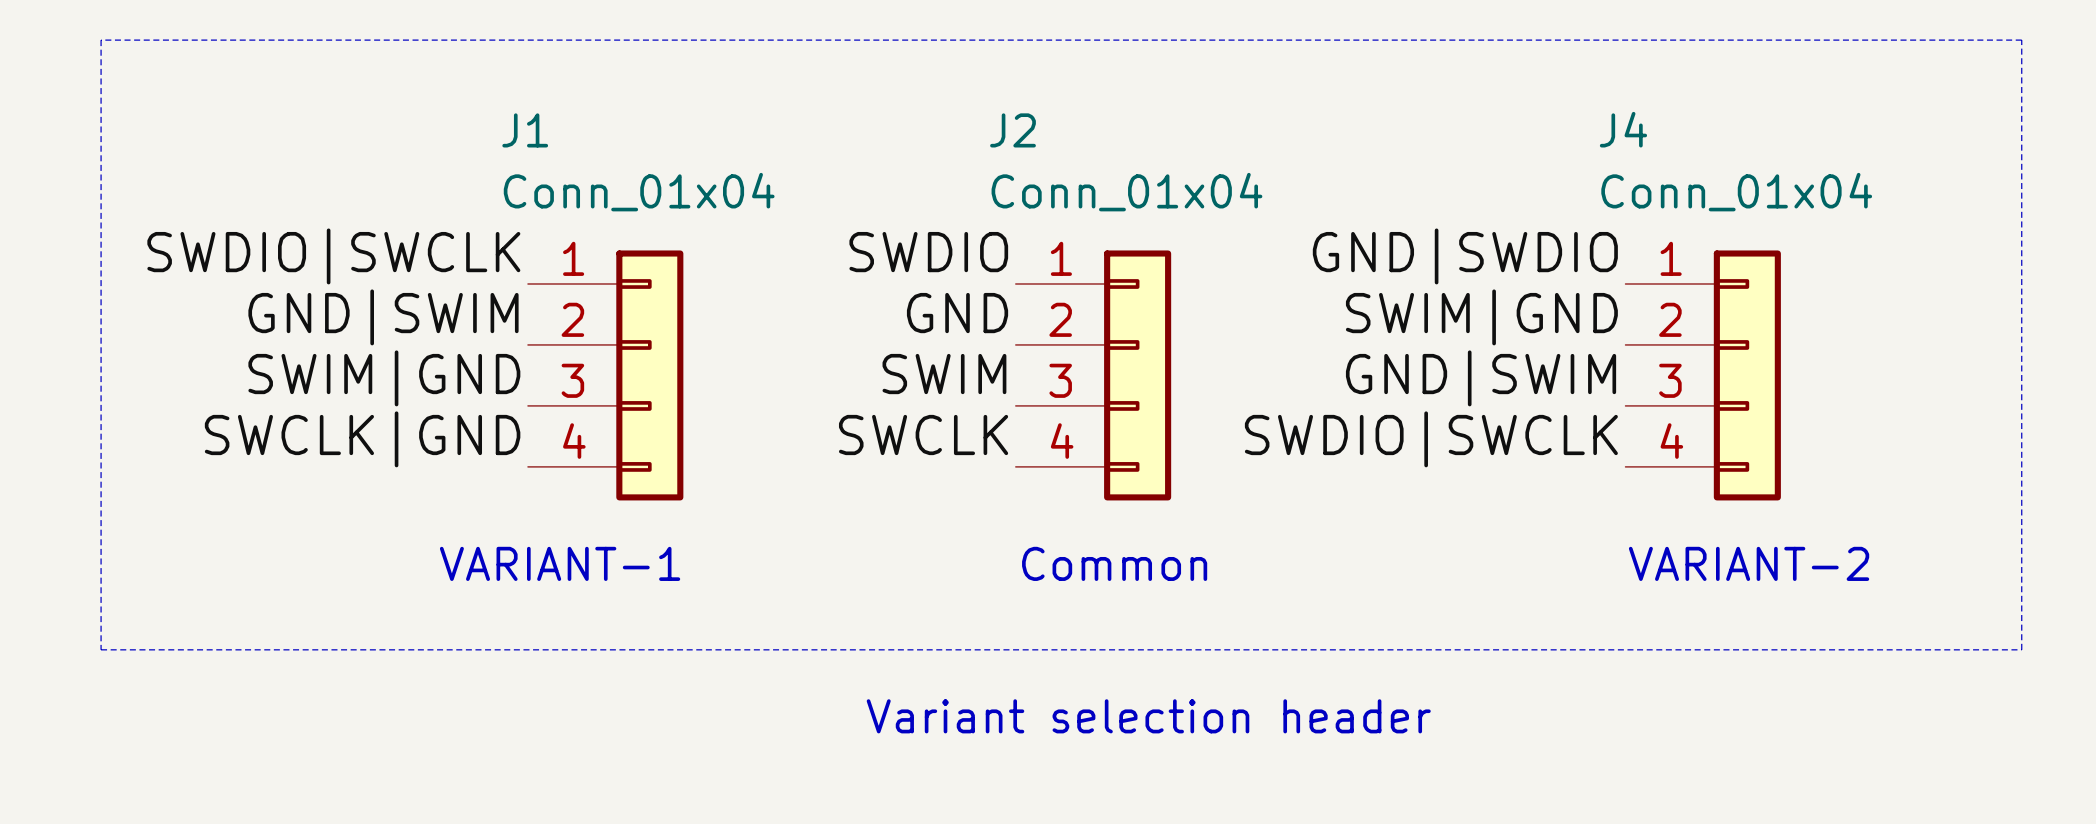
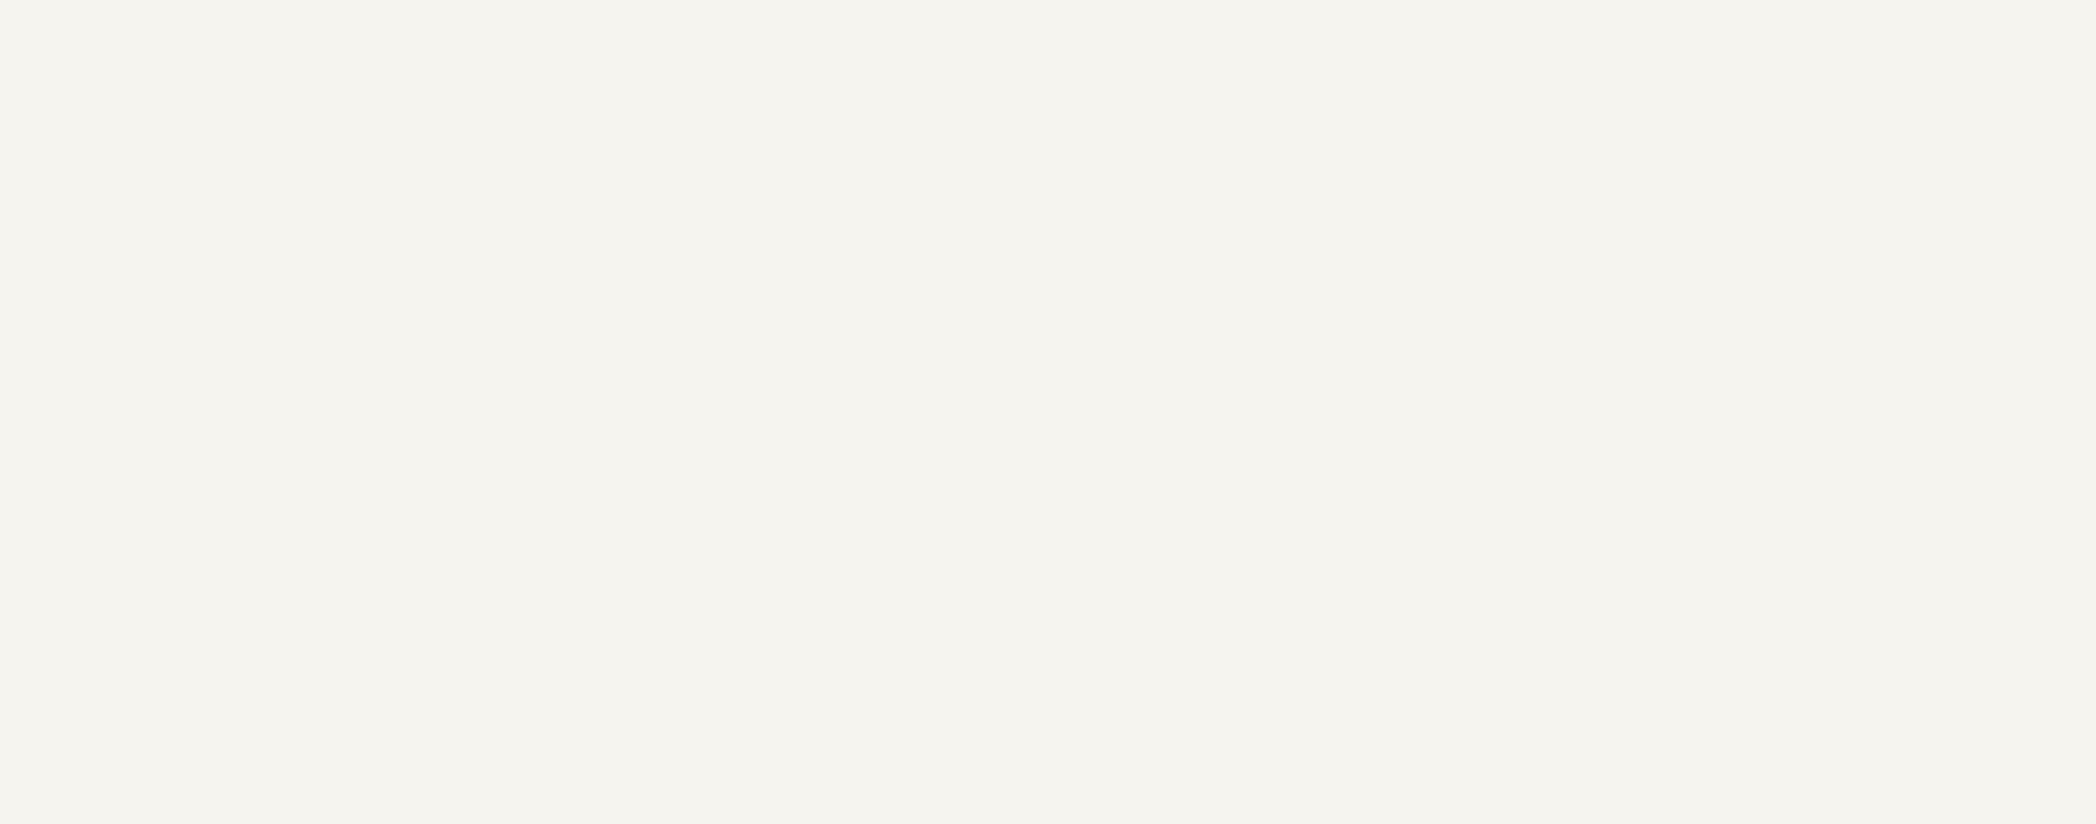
line: (101, 40) (101, 649) (2021, 649) (2021, 40) (101, 40) -> none
label: SWDIO (928, 252) -> none
label: SWDIO|SWCLK (333, 256) -> none
label: GND|SWDIO (1465, 256) -> none
label: GND (957, 313) -> none
label: GND|SWIM (383, 317) -> none
label: SWIM|GND (1481, 317) -> none
label: SWIM (944, 374) -> none
J1: Conn_01x04 (605, 375) -> none
J2: Conn_01x04 (1093, 375) -> none
J4: Conn_01x04 (1703, 375) -> none
label: SWIM|GND (384, 378) -> none
label: GND|SWIM (1481, 378) -> none
label: SWCLK (923, 435) -> none
label: SWCLK|GND (362, 439) -> none
label: SWDIO|SWCLK (1431, 439) -> none
text: VARIANT-1 (560, 563) -> none
text: Common (1114, 563) -> none
text: VARIANT-2 (1749, 563) -> none
text: Variant selection header (1148, 716) -> none

